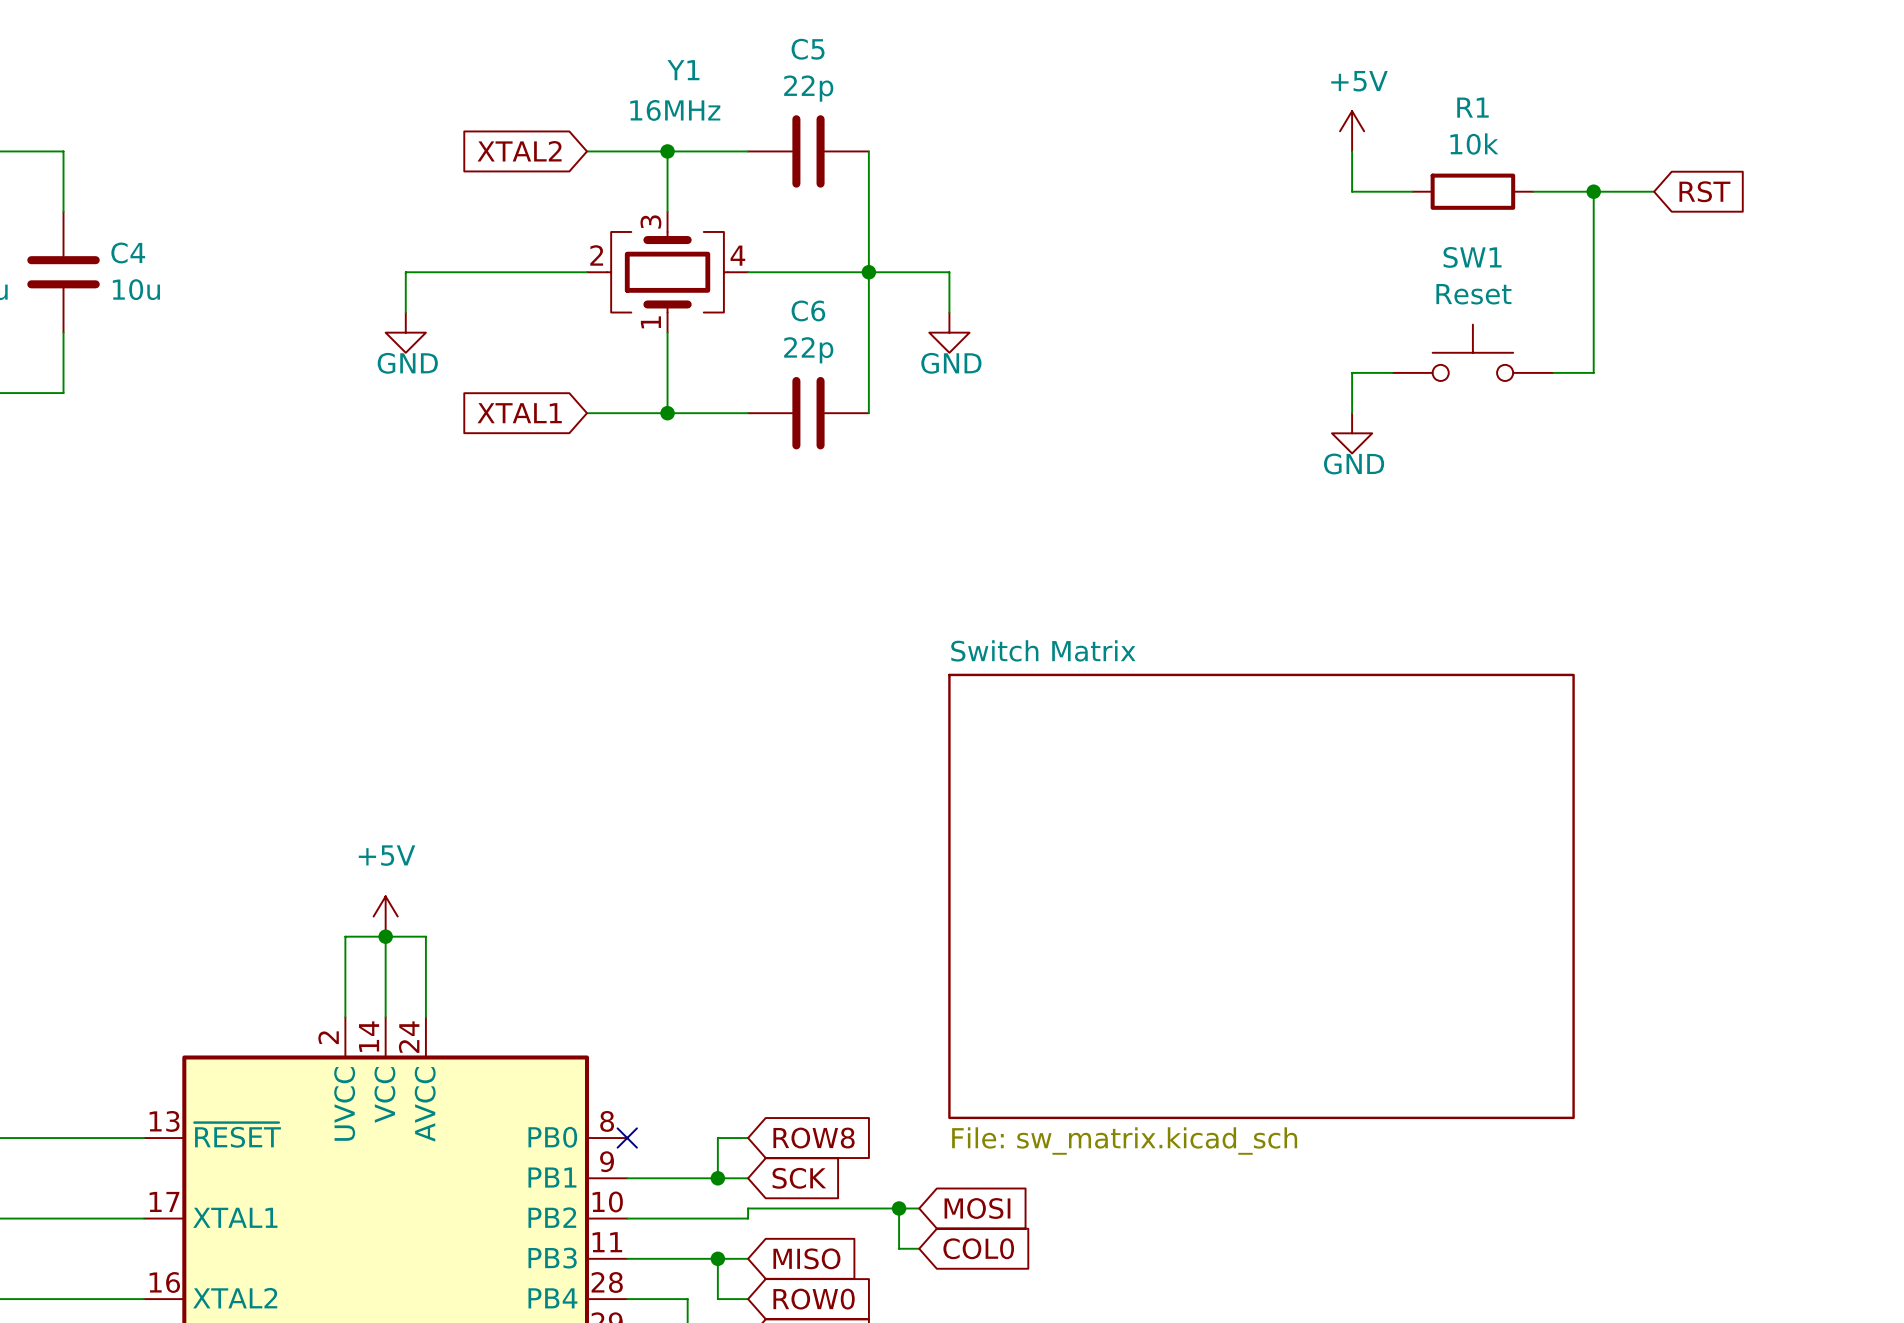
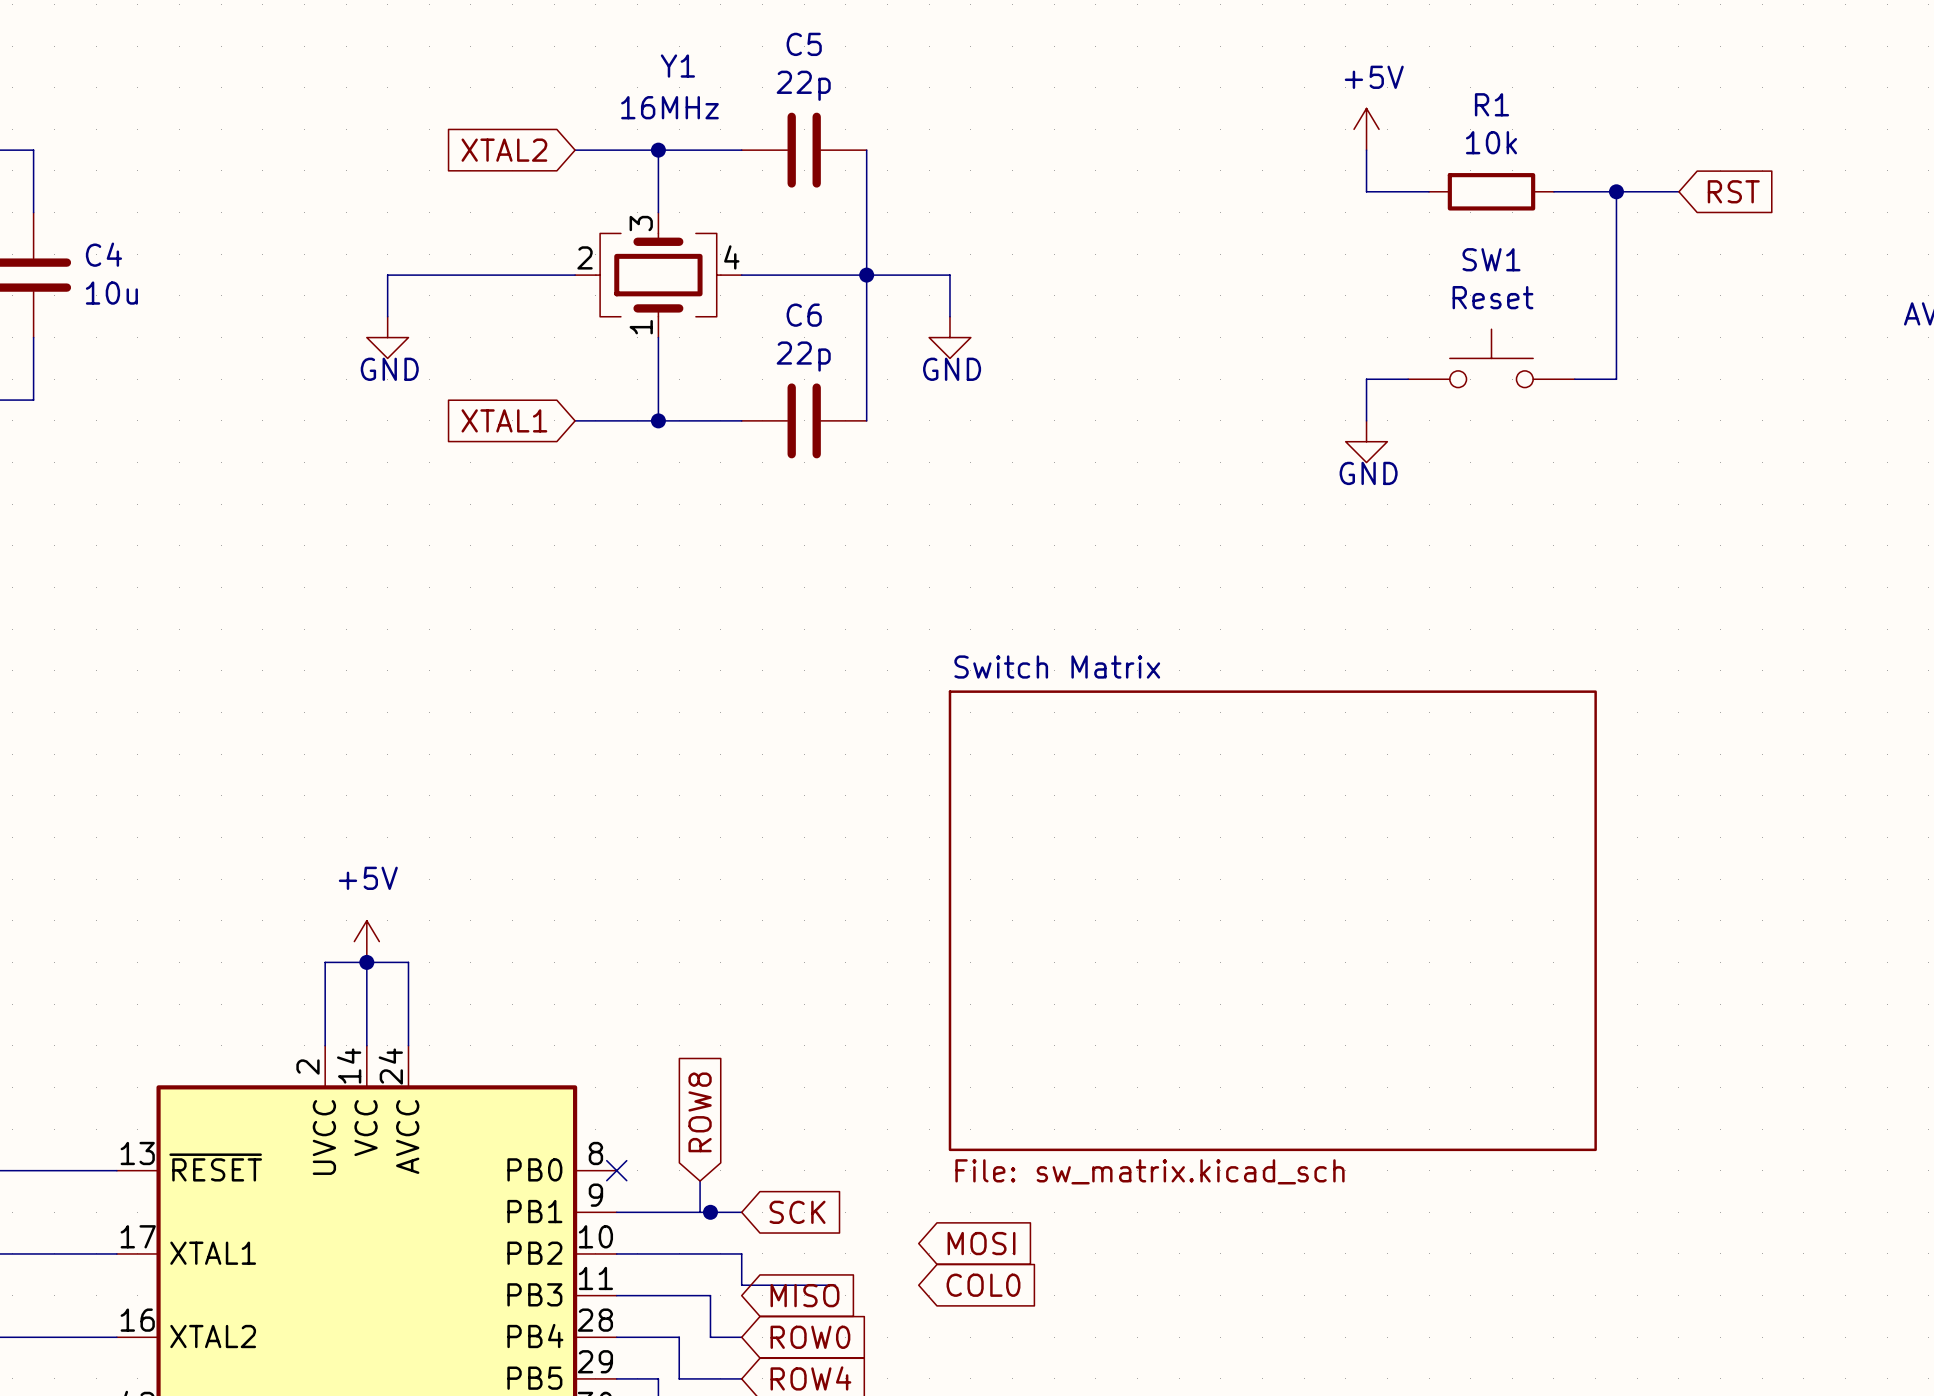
wire: (748, 1138) (717, 1138) (717, 1178) -> none
global label rotation: 0° (814, 1138) -> 90° counterclockwise (700, 1112)
wire: none -> (700, 1181) (700, 1212)
wire: (899, 1208) (899, 1248) (919, 1248) -> none
junction: (899, 1208) -> none
wire: (919, 1208) (748, 1208) (748, 1218) -> (835, 1285) (741, 1285) (741, 1253)
wire: (717, 1258) (748, 1258) -> none
junction: (717, 1258) -> none

